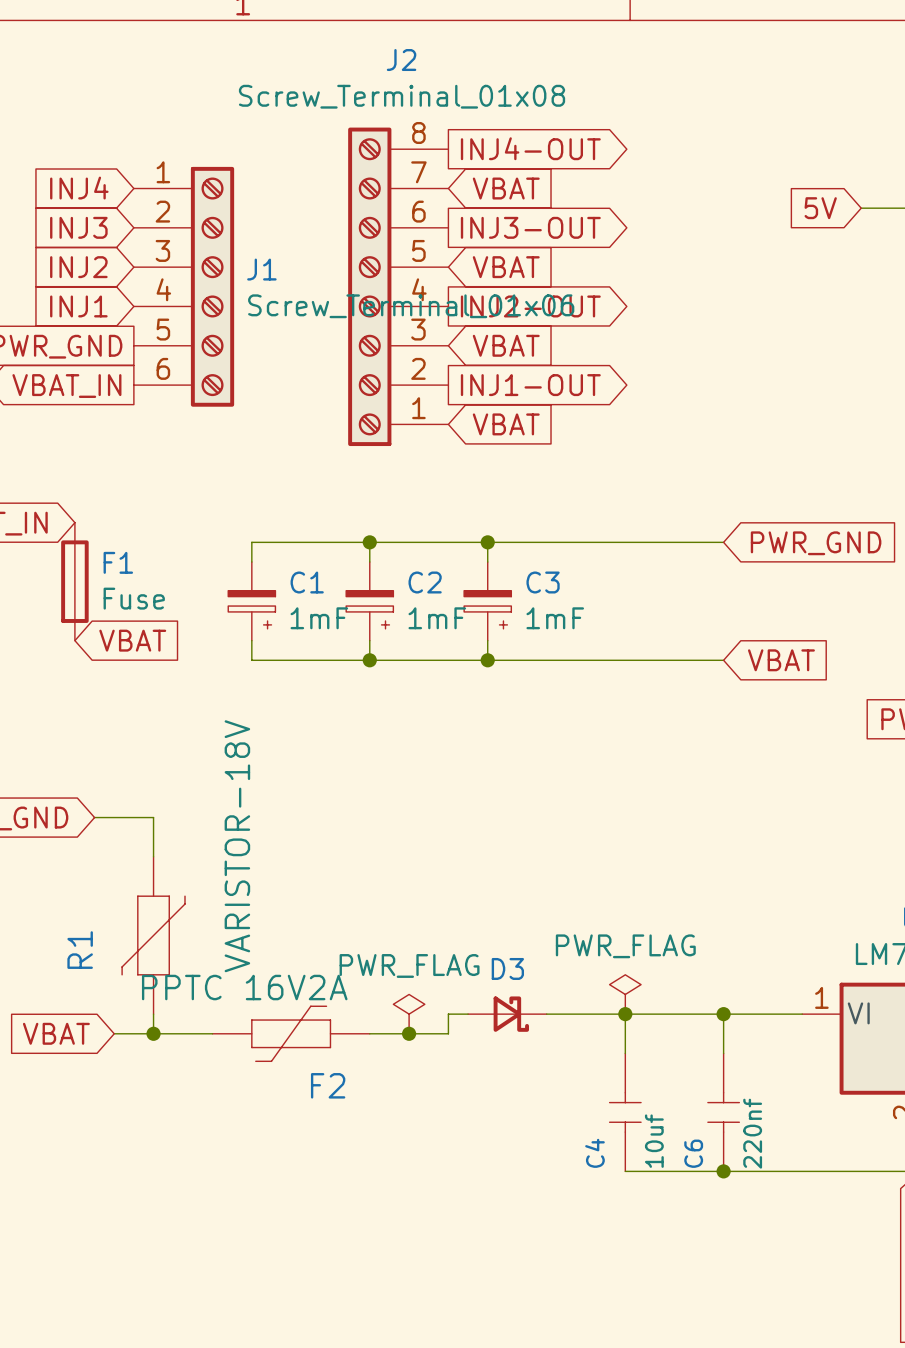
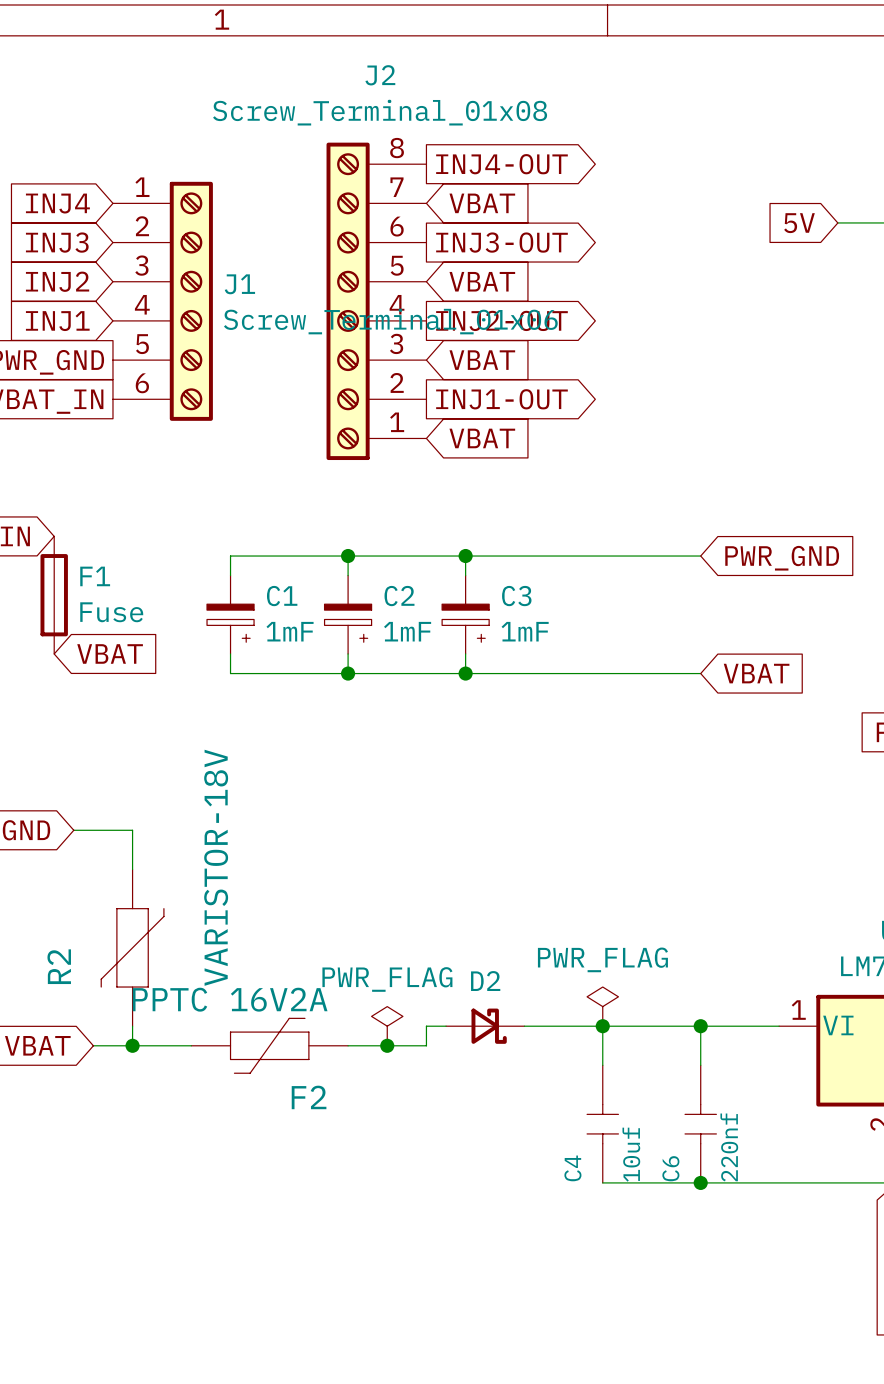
R1 name: R1 (80, 950) -> R2 (59, 966)
D3 name: D3 (507, 968) -> D2 (485, 981)

